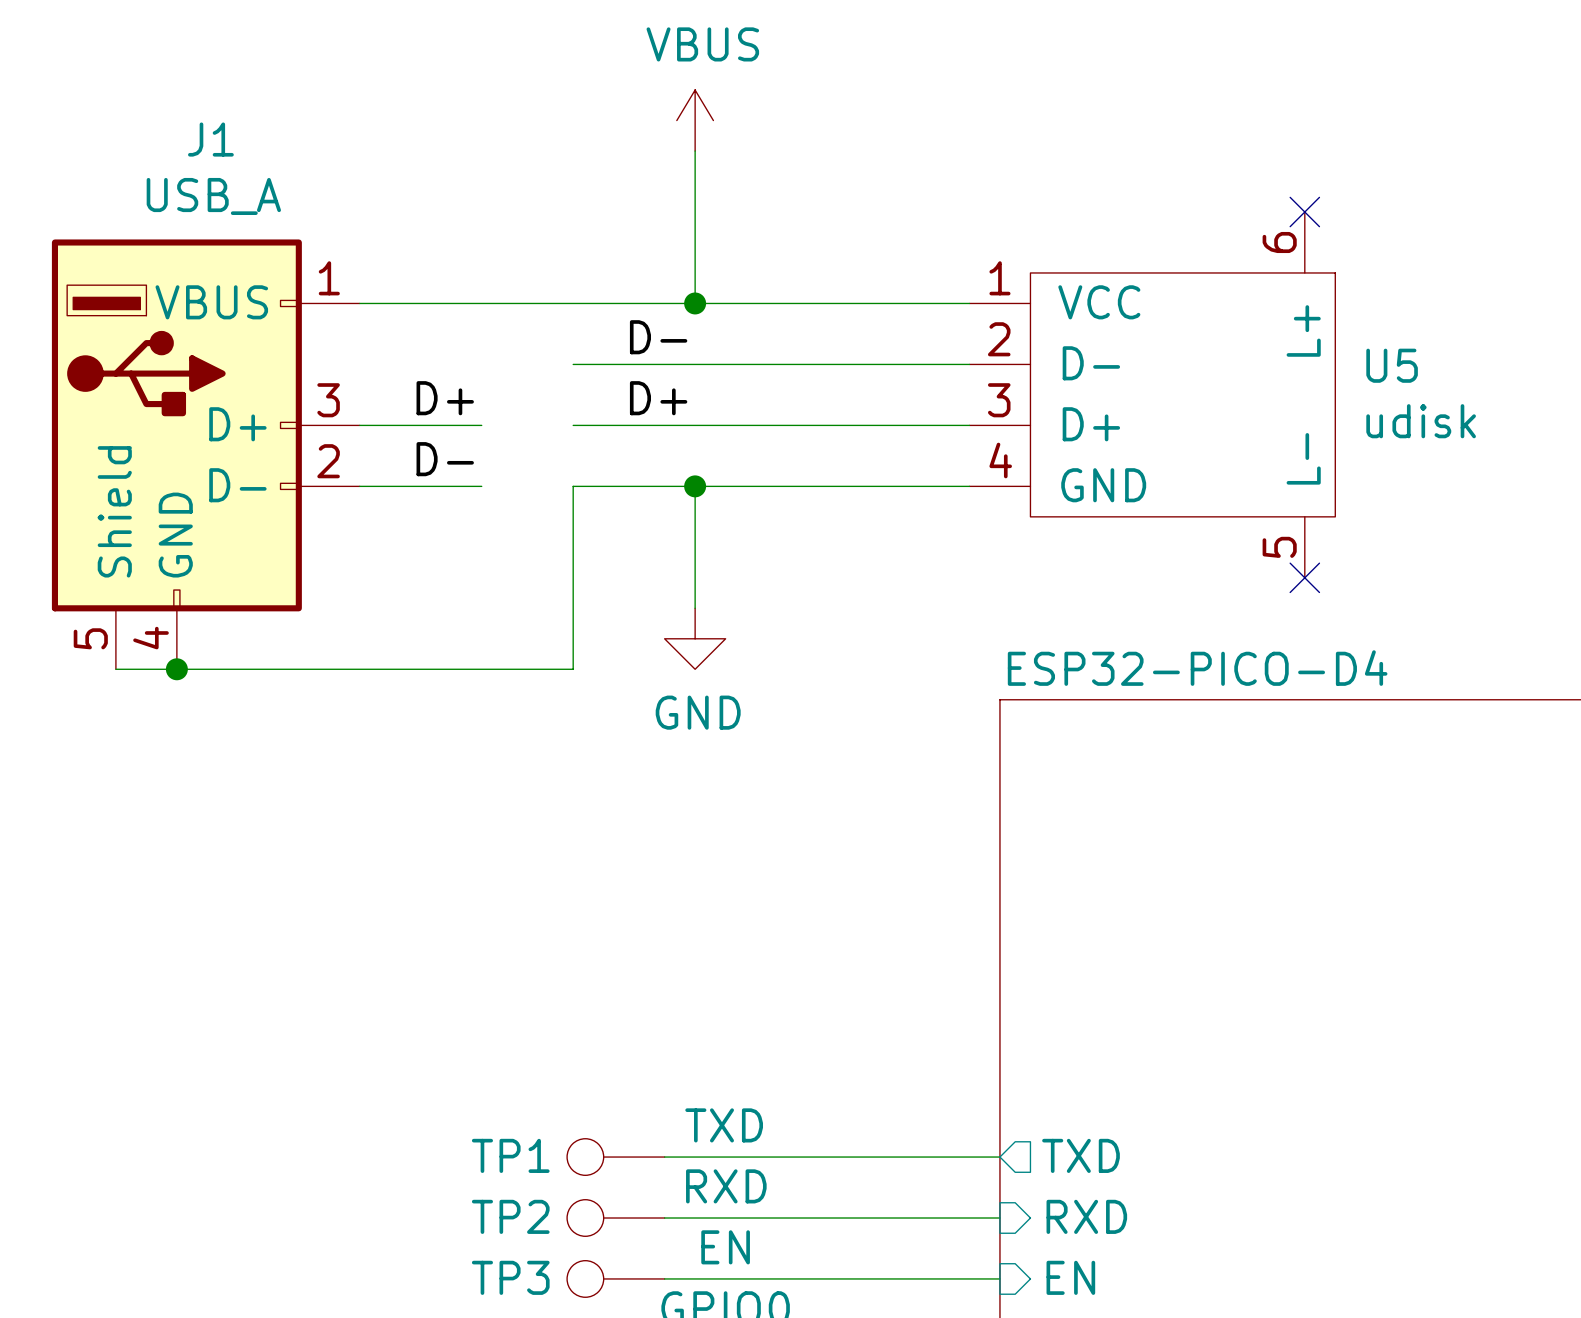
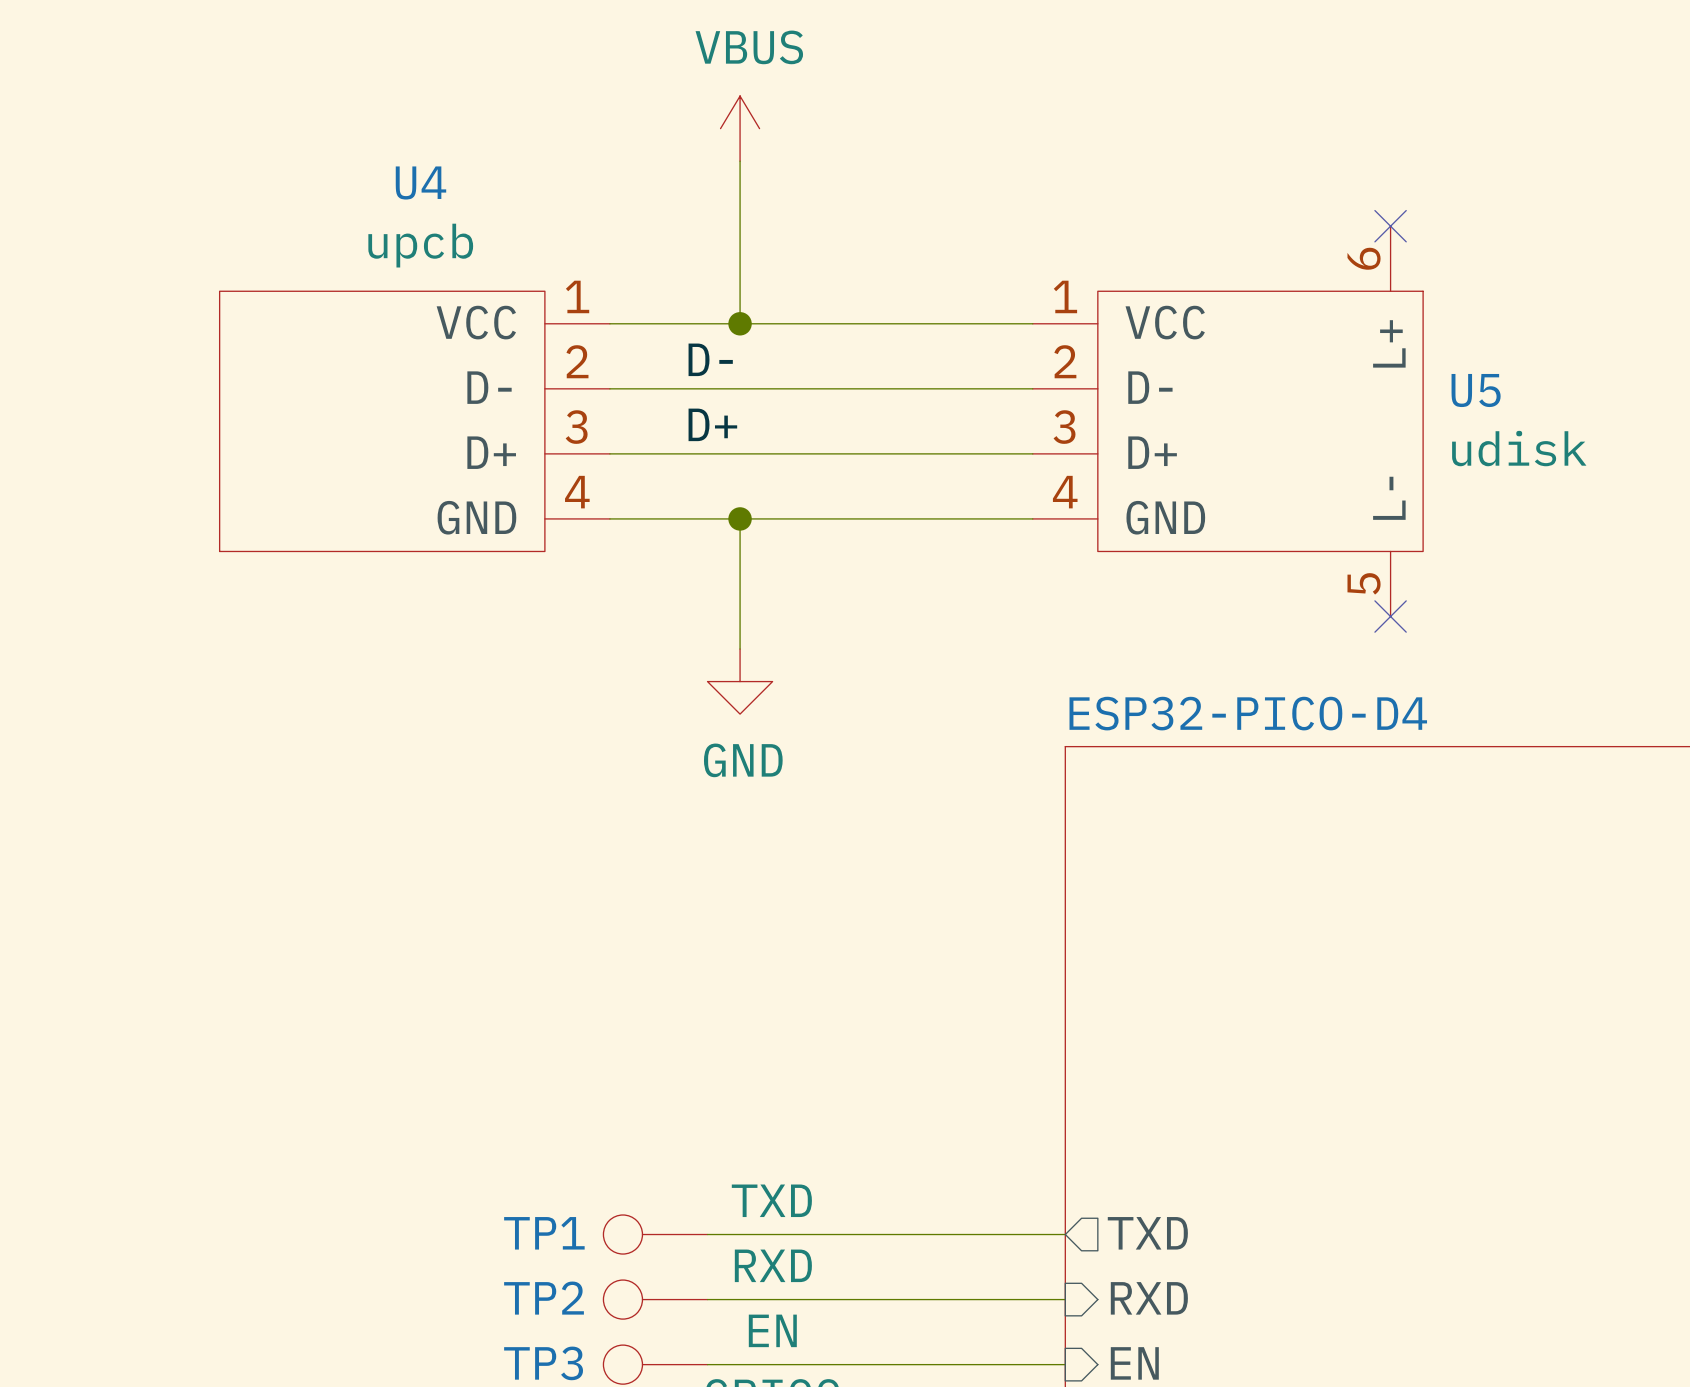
wire: (359, 303) (573, 303) -> none
U4: none -> upcb (414, 421)
label: D+ (445, 398) -> none
wire: (359, 425) (481, 425) -> none
J1: USB_A (205, 454) -> none
label: D- (445, 459) -> none
wire: (359, 486) (481, 486) -> none
wire: (573, 486) (573, 669) (115, 669) -> none
junction: (176, 669) -> none

